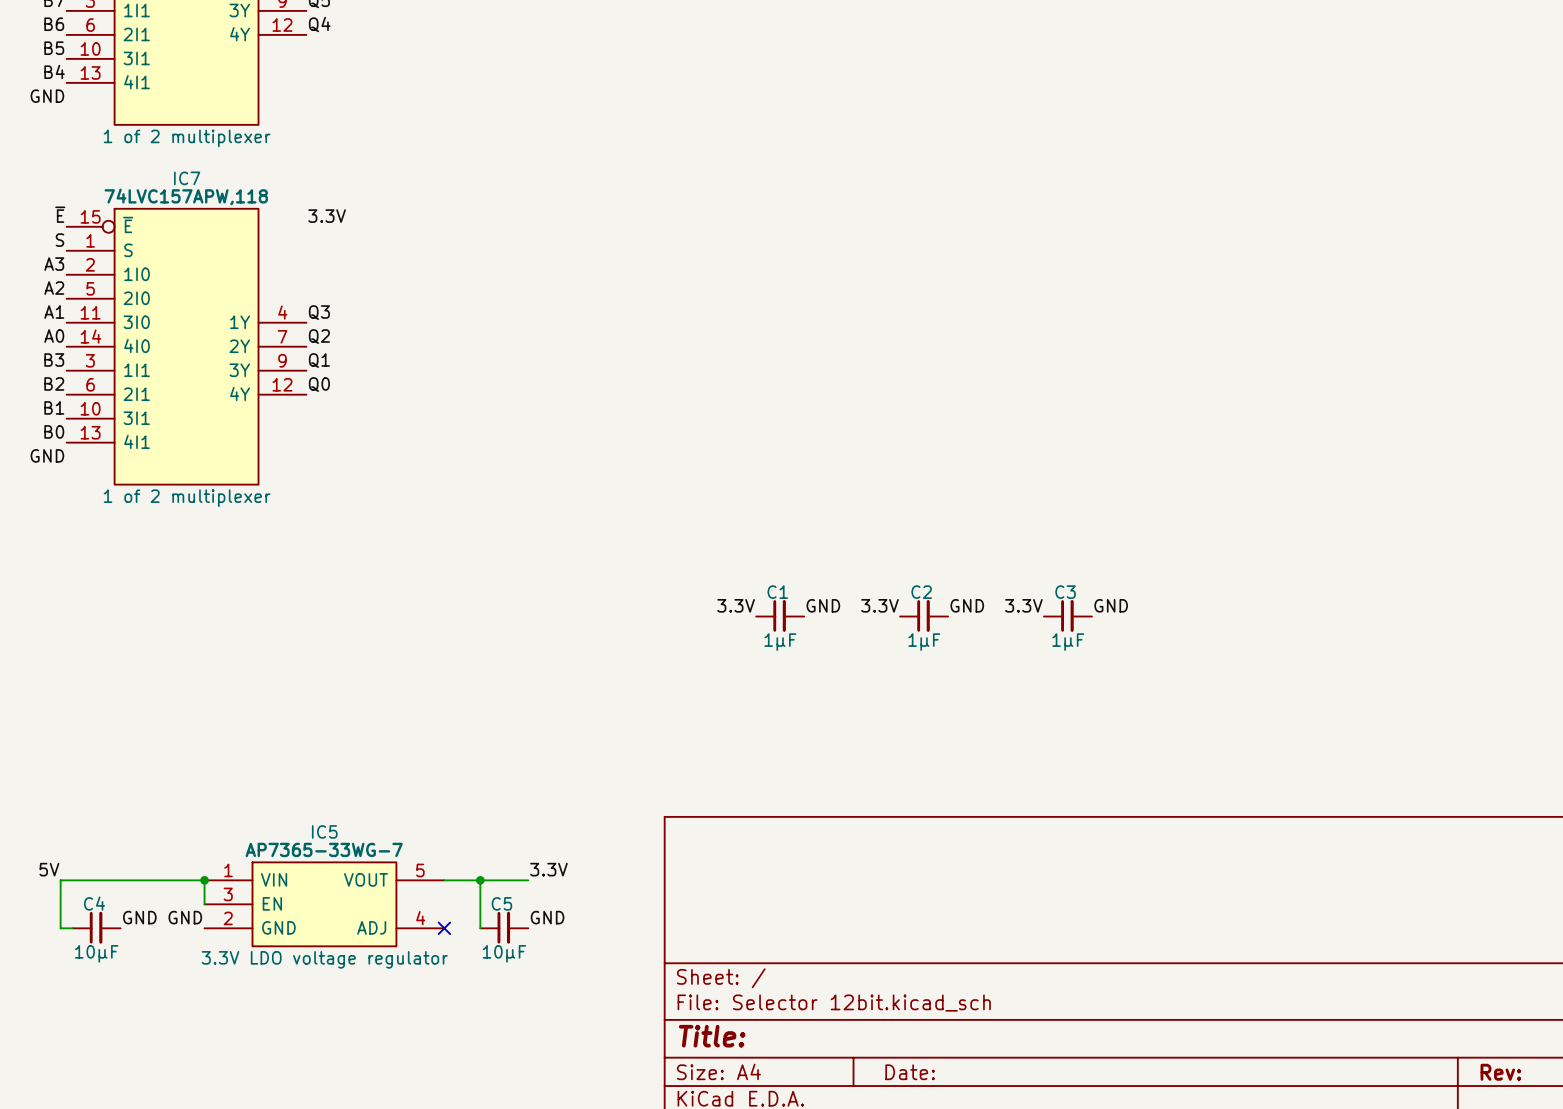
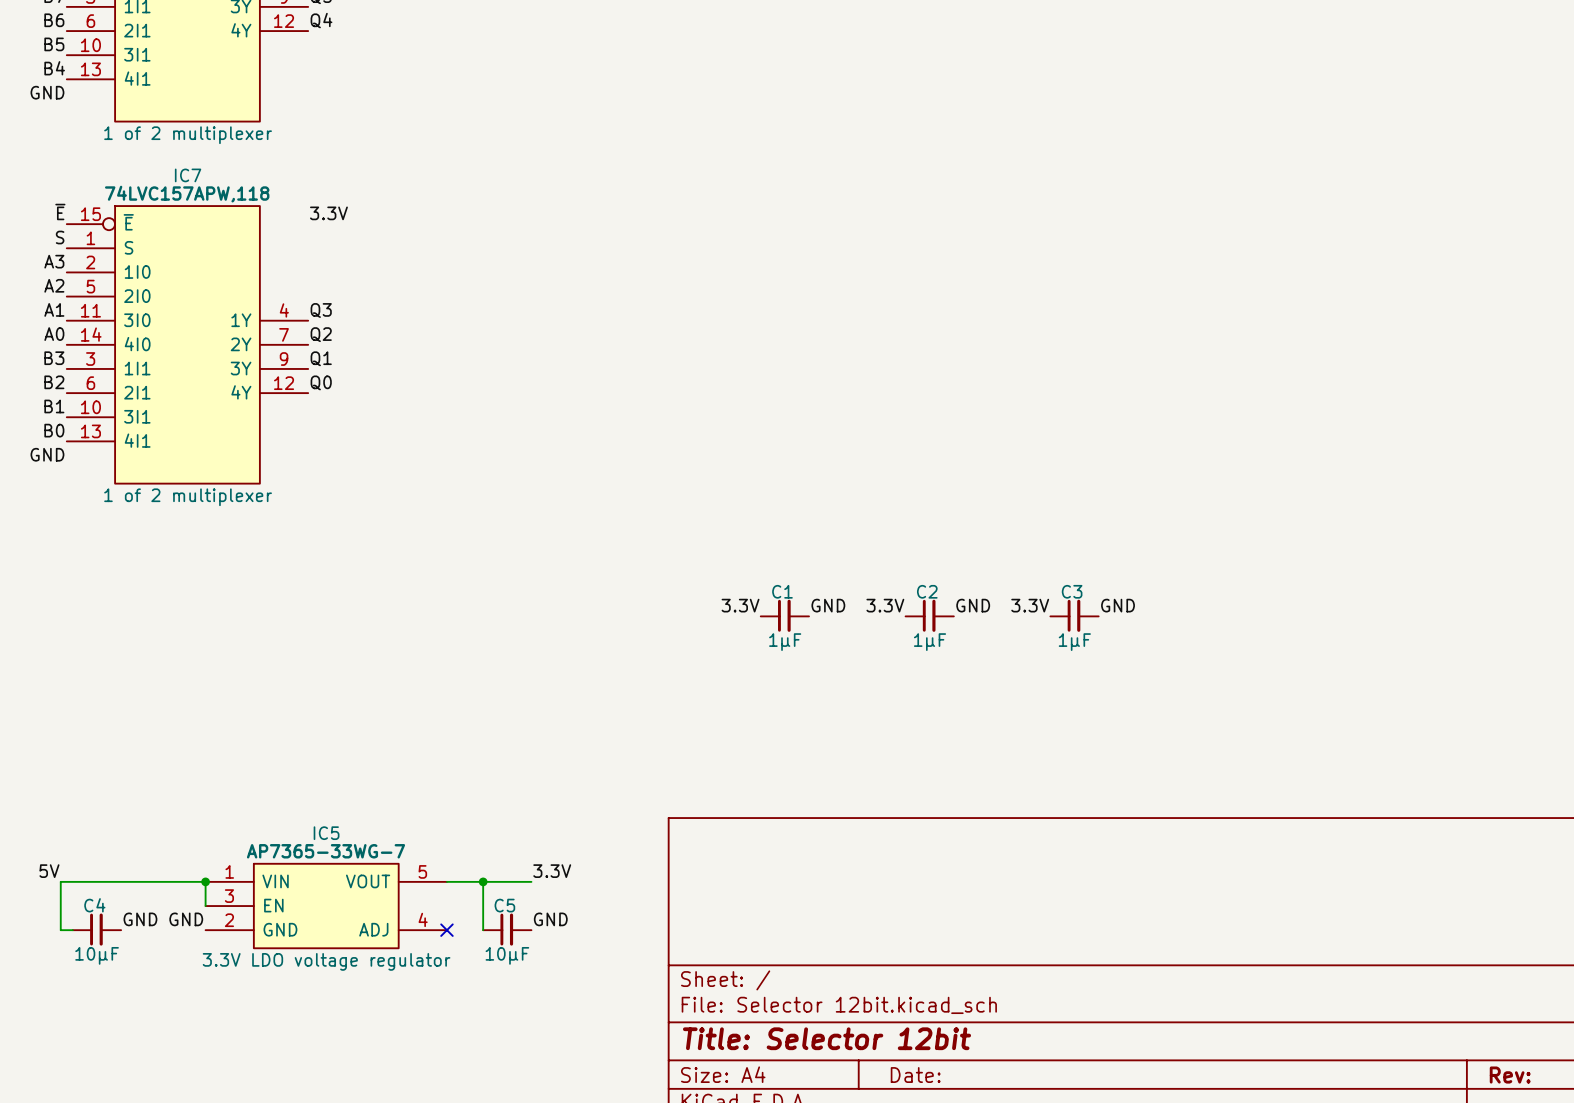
title block: Title: (712, 1036) -> Title: Selector 12bit (827, 1038)

